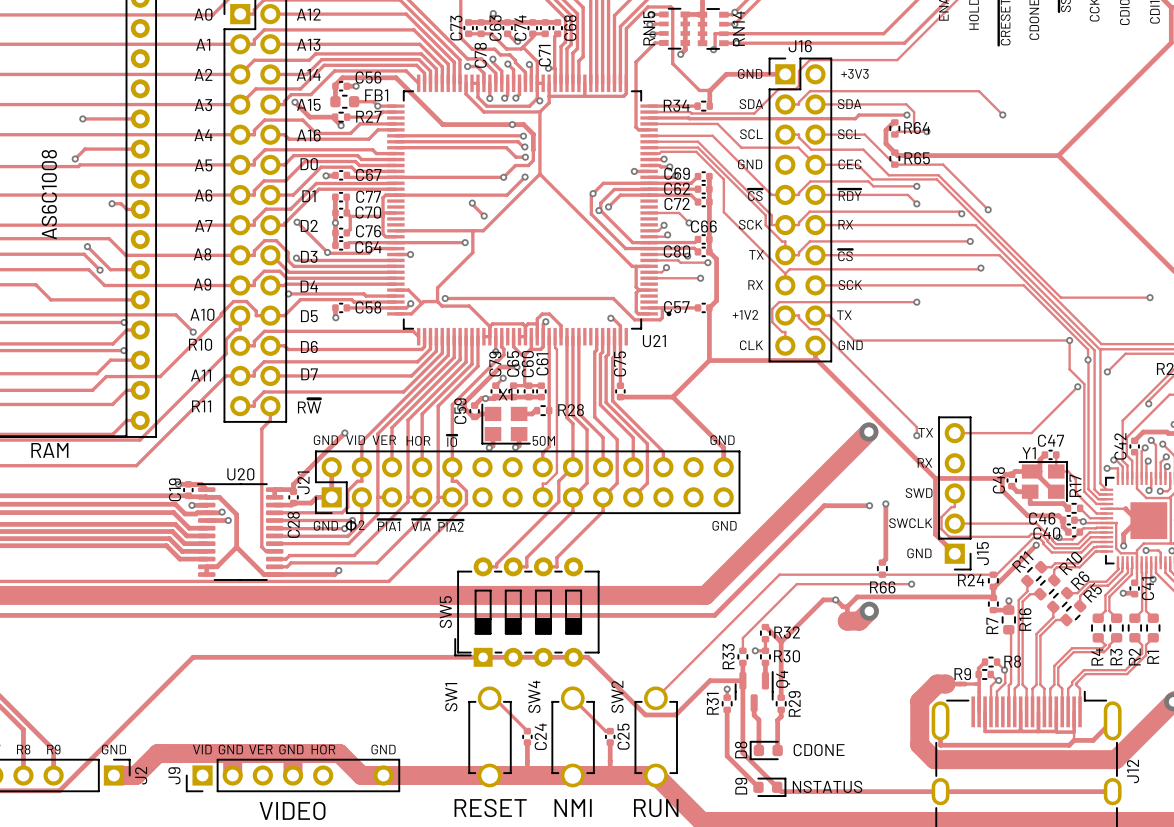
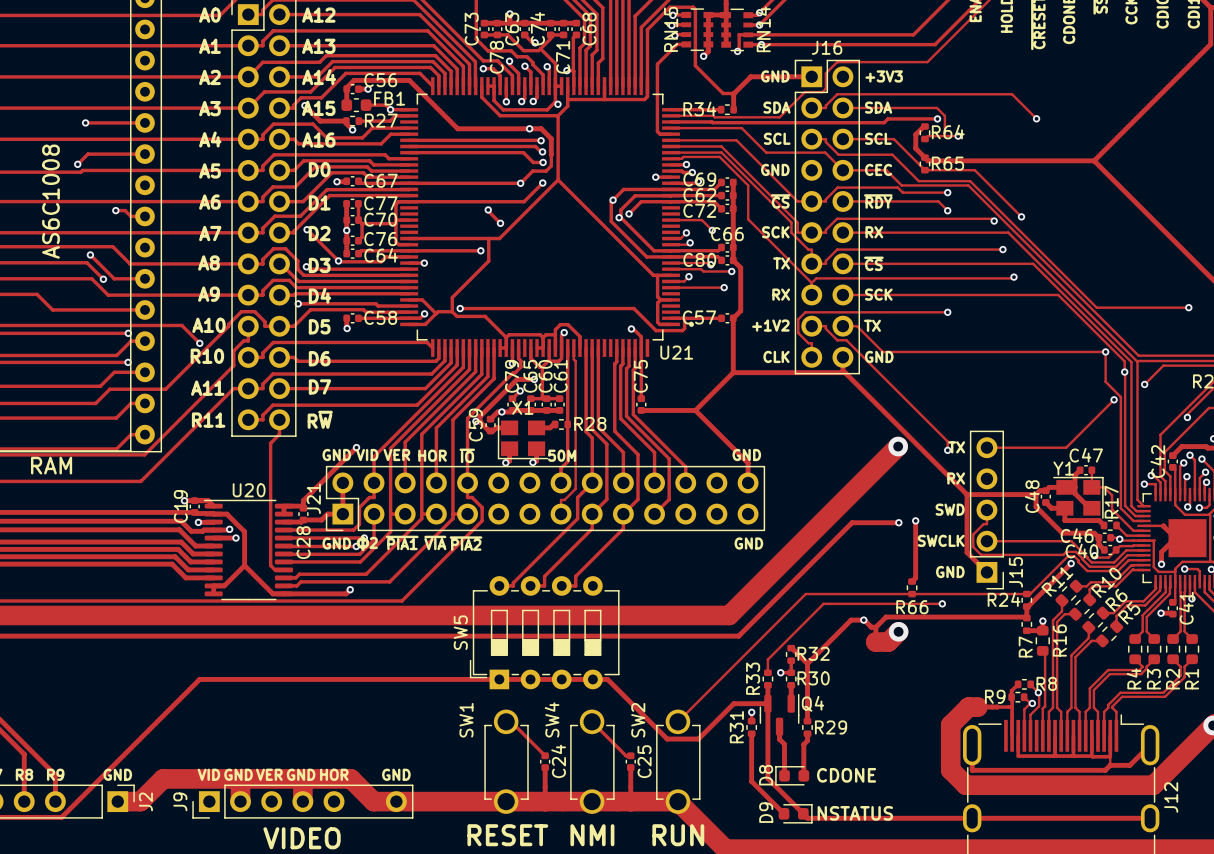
Q4 name rotation: 0° (783, 679) -> 90° clockwise (812, 703)
R29 name rotation: 0° (794, 703) -> 90° clockwise (831, 727)

